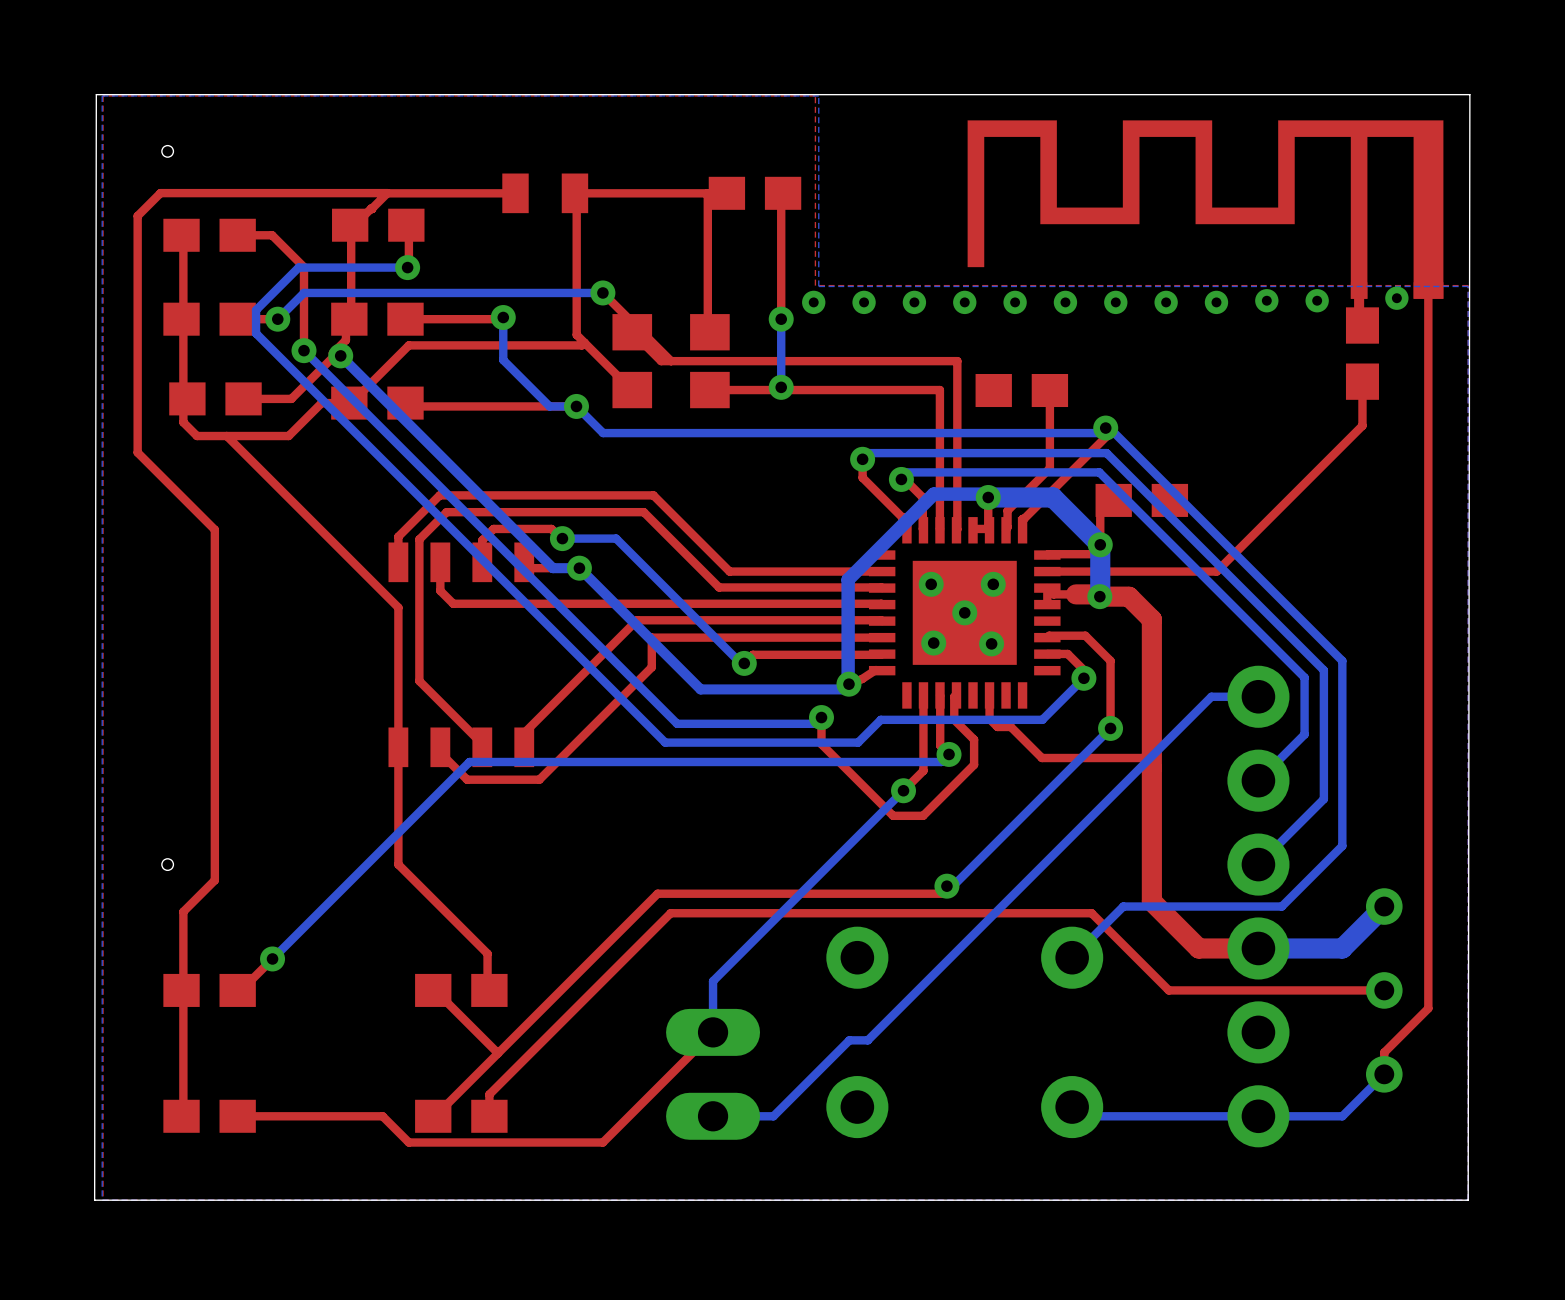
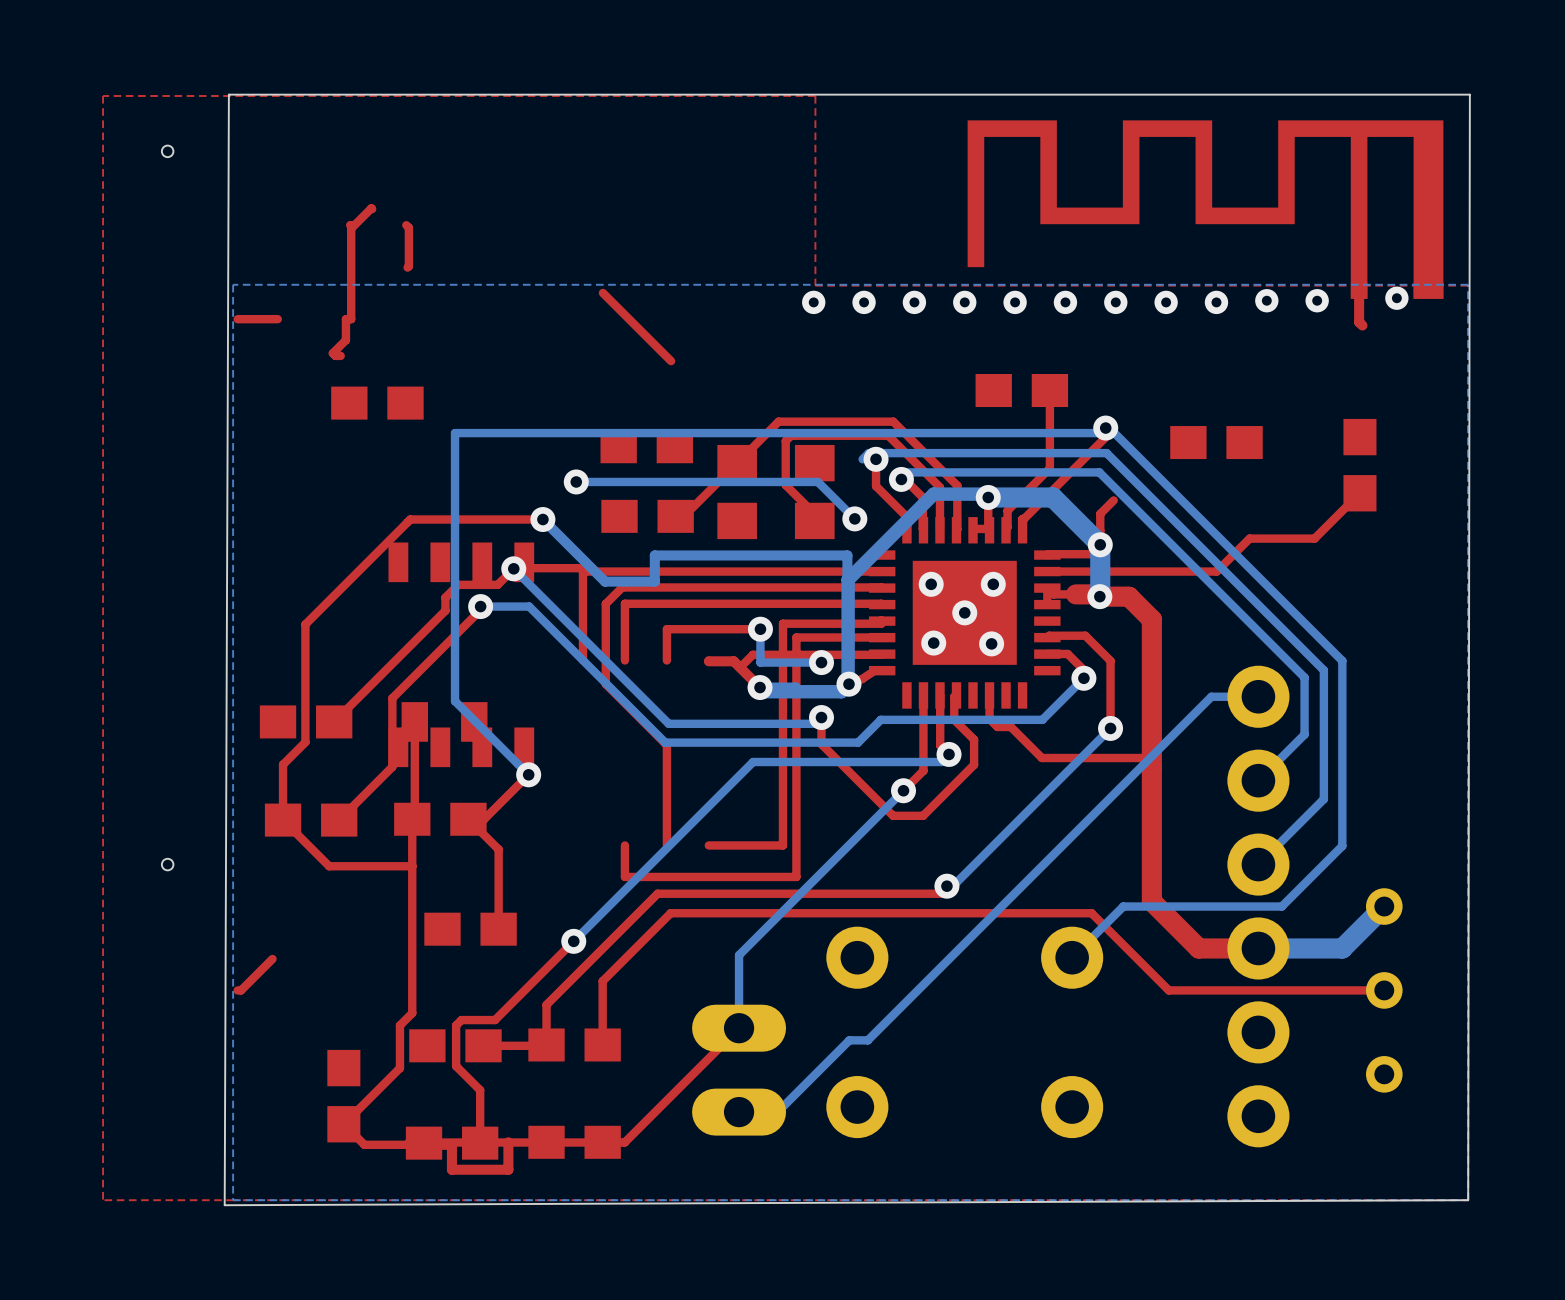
board edge: (228, 94) (96, 94) (94, 1200) (1468, 1200) -> (228, 94) (224, 1205) (1468, 1200)
top track: (515, 193) (387, 193) -> none
part position: (545, 193) -> (444, 721)
top track: (576, 193) (576, 334) (632, 390) -> none
top track: (707, 193) (707, 329) (723, 345) -> none
top track: (726, 193) (574, 193) -> none
part: (754, 193) -> none
top track: (783, 193) (781, 193) (781, 319) -> none
top track: (371, 209) (387, 193) (160, 193) (137, 215) (137, 452) (214, 529) (214, 880) (183, 911) (183, 1116) (181, 1116) -> none
part: (378, 225) -> none
top track: (181, 235) (183, 235) (183, 422) (197, 436) (288, 436) (321, 403) (351, 403) (408, 345) (581, 345) (584, 342) -> none
part: (209, 235) -> none
top track: (237, 235) (272, 235) (304, 267) (304, 350) -> none
bottom track: (407, 267) (298, 267) (256, 310) (256, 333) (529, 606) -> (480, 606) (529, 606)
via: (407, 267) -> none
bottom zone outline: (1468, 286) (818, 286) (818, 95) (102, 95) (102, 1200) (233, 1200) -> (1468, 286) (1468, 284) (233, 284) (233, 1200)
top track: (1428, 290) (1428, 1008) (1384, 1052) (1384, 1074) -> none
bottom track: (602, 292) (304, 292) (277, 319) -> none
via: (602, 292) -> none
bottom track: (503, 317) (503, 360) (549, 406) (576, 406) (603, 433) -> (528, 774) (455, 701) (455, 433) (603, 433)
top track: (503, 317) (501, 319) (405, 319) -> none
via: (503, 317) -> none
part: (209, 319) -> none
via: (277, 319) -> none
part: (377, 319) -> none
bottom track: (781, 319) (781, 387) -> none
via: (781, 319) -> none
top track: (632, 332) (661, 361) (957, 361) (957, 485) -> (675, 516) (683, 516) (778, 421) (893, 421) (957, 485)
bottom track: (304, 350) (677, 723) -> (513, 568) (668, 723) (677, 723)
via: (304, 350) -> none
part: (1362, 353) -> none
top track: (334, 355) (291, 398) (243, 398) -> none
bottom track: (340, 355) (552, 568) (579, 568) (700, 689) (843, 689) -> (542, 519) (605, 581) (654, 581) (654, 555) (847, 555) (847, 691) (795, 691) (795, 687) (760, 687) (764, 691) (841, 691) (843, 689)
via: (340, 355) -> none
part position: (671, 361) -> (775, 492)
top track: (1362, 381) (1362, 425) (1249, 538) -> (1359, 493) (1314, 538) (1249, 538)
via: (781, 387) -> none
top track: (709, 390) (939, 390) (939, 487) -> (814, 520) (814, 514) (785, 485) (785, 441) (791, 435) (888, 435) (939, 487)
part: (215, 398) -> none
top track: (405, 403) (408, 406) (576, 406) -> none
via: (576, 406) -> none
top track: (226, 436) (398, 607) (398, 864) (487, 953) (487, 990) (489, 990) -> none
part: none -> (1216, 442)
part: none -> (646, 446)
top track: (862, 459) (862, 477) (902, 517) (906, 517) -> (876, 459) (876, 486) (906, 517)
via position: (862, 459) -> (876, 459)
part: none -> (1359, 465)
bottom track: none -> (576, 481) (817, 481) (854, 518)
via: none -> (576, 481)
part: (1141, 500) -> none
part: none -> (647, 516)
via: none -> (854, 518)
top track: none -> (542, 519) (410, 519) (305, 624) (305, 742) (283, 764) (283, 820) (329, 866) (412, 866)
bottom track: (562, 538) (616, 538) (740, 663) (744, 663) -> none
via position: (562, 538) -> (542, 519)
top track: (562, 539) (551, 528) (493, 528) (482, 540) (482, 562) -> none
top track: (398, 562) (398, 536) (439, 495) (653, 495) (729, 571) -> (582, 660) (582, 571) (729, 571)
top track: (440, 562) (440, 590) (453, 603) (624, 603) -> (624, 660) (624, 603)
top track: none -> (513, 568) (497, 584) (458, 584) (445, 597) (445, 610) (334, 721)
via: none -> (513, 568)
via: (579, 568) -> none
top track: (719, 587) (643, 512) (446, 512) (419, 539) (419, 681) (482, 743) (482, 747) -> (719, 587) (622, 587) (605, 603) (605, 684) (666, 745) (666, 845)
top track: none -> (480, 606) (480, 610) (392, 698) (392, 766) (339, 820)
via: none -> (480, 606)
top track: (881, 620) (637, 620) (524, 733) (524, 747) -> (881, 620) (881, 623) (782, 623) (782, 845) (708, 845)
bottom track: none -> (760, 629) (760, 662) (821, 662)
top track: none -> (760, 629) (666, 629) (666, 660)
via: none -> (760, 629)
top track: (796, 637) (651, 637) (651, 667) (539, 779) (467, 779) (440, 752) (440, 747) -> (796, 637) (796, 876) (624, 876) (624, 845)
top track: none -> (708, 660) (733, 661) (760, 687)
via: none -> (821, 662)
via position: (744, 663) -> (760, 687)
part: none -> (306, 721)
top track: none -> (414, 721) (414, 816) (412, 819) (412, 1013) (399, 1025) (399, 1068) (343, 1124) (364, 1144) (422, 1144) (424, 1143)
bottom track: (753, 762) (469, 762) (272, 958) -> (753, 762) (573, 941)
top track: none -> (528, 774) (484, 819) (468, 819) (498, 849) (498, 929)
via: none -> (528, 774)
part: none -> (440, 819)
part: none -> (311, 820)
part: none -> (470, 929)
top track: none -> (573, 941) (495, 1020) (461, 1020) (456, 1025) (456, 1066) (480, 1090) (480, 1143)
via: none -> (573, 941)
bottom track: (739, 955) (713, 981) (713, 1032) -> (739, 955) (739, 1028)
via: (272, 958) -> none
top track: (602, 981) (489, 1094) (489, 1116) -> (602, 981) (602, 1044)
part: (209, 990) -> none
top track: (433, 990) (498, 1053) -> none
part: (461, 990) -> none
top track: (546, 1004) (433, 1116) -> (546, 1004) (545, 1045) (483, 1045)
top track: (713, 1032) (602, 1142) -> (739, 1028) (624, 1142) (602, 1142)
part: none -> (574, 1044)
part: none -> (455, 1045)
part position: (713, 1074) -> (739, 1070)
bottom track: (1384, 1074) (1342, 1116) (1080, 1116) (1072, 1107) -> none
part: none -> (343, 1096)
part: (209, 1116) -> none
top track: (237, 1116) (382, 1116) (408, 1142) -> none
part position: (461, 1116) -> (452, 1143)
top track: none -> (508, 1142) (508, 1169) (451, 1169) (451, 1144) (416, 1144)
part: none -> (574, 1142)

